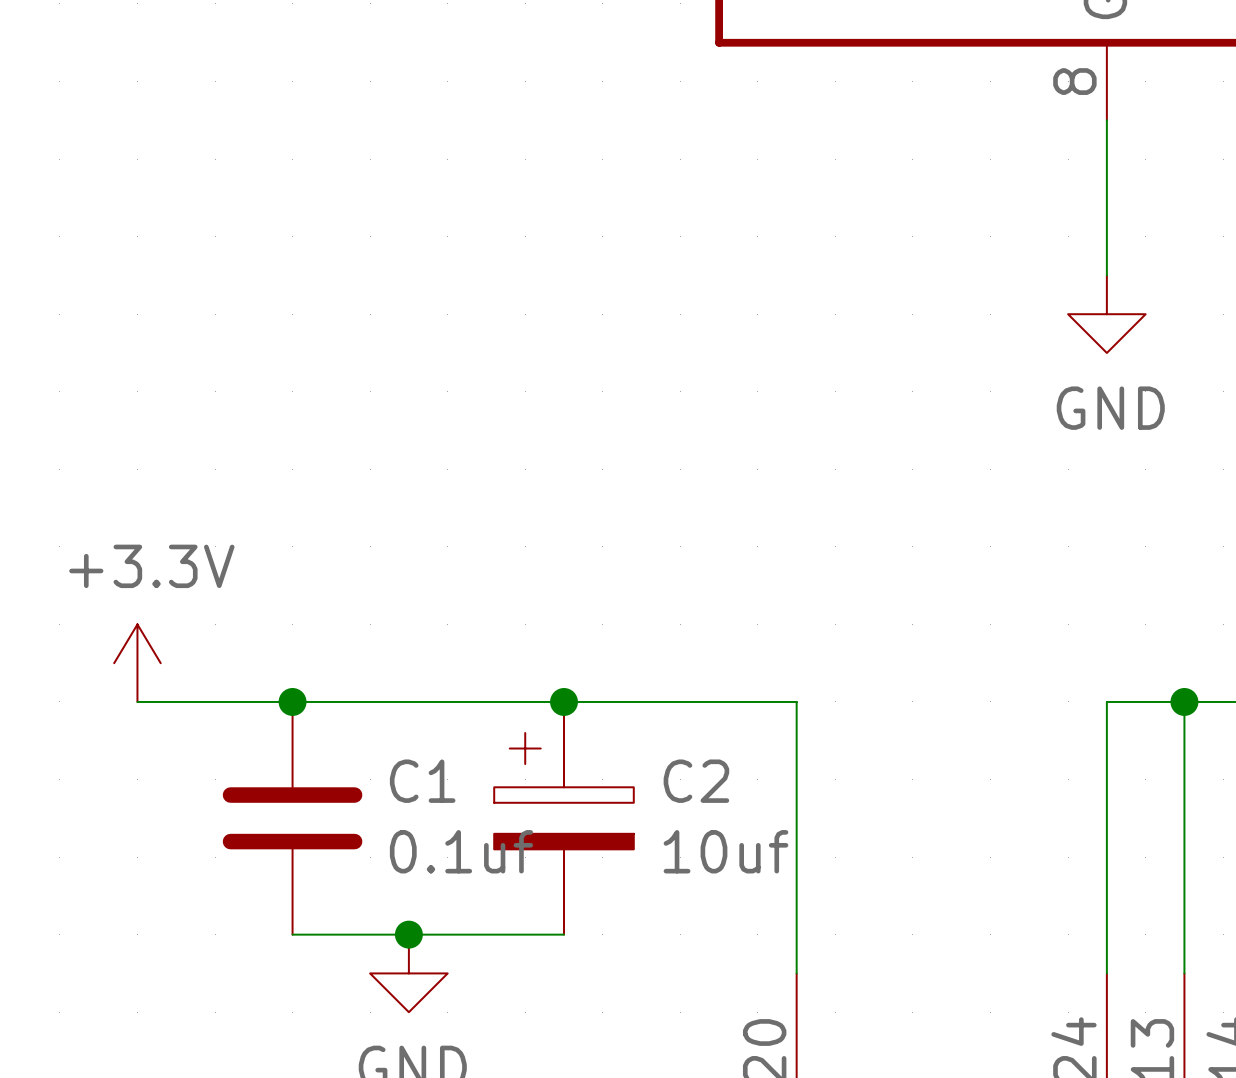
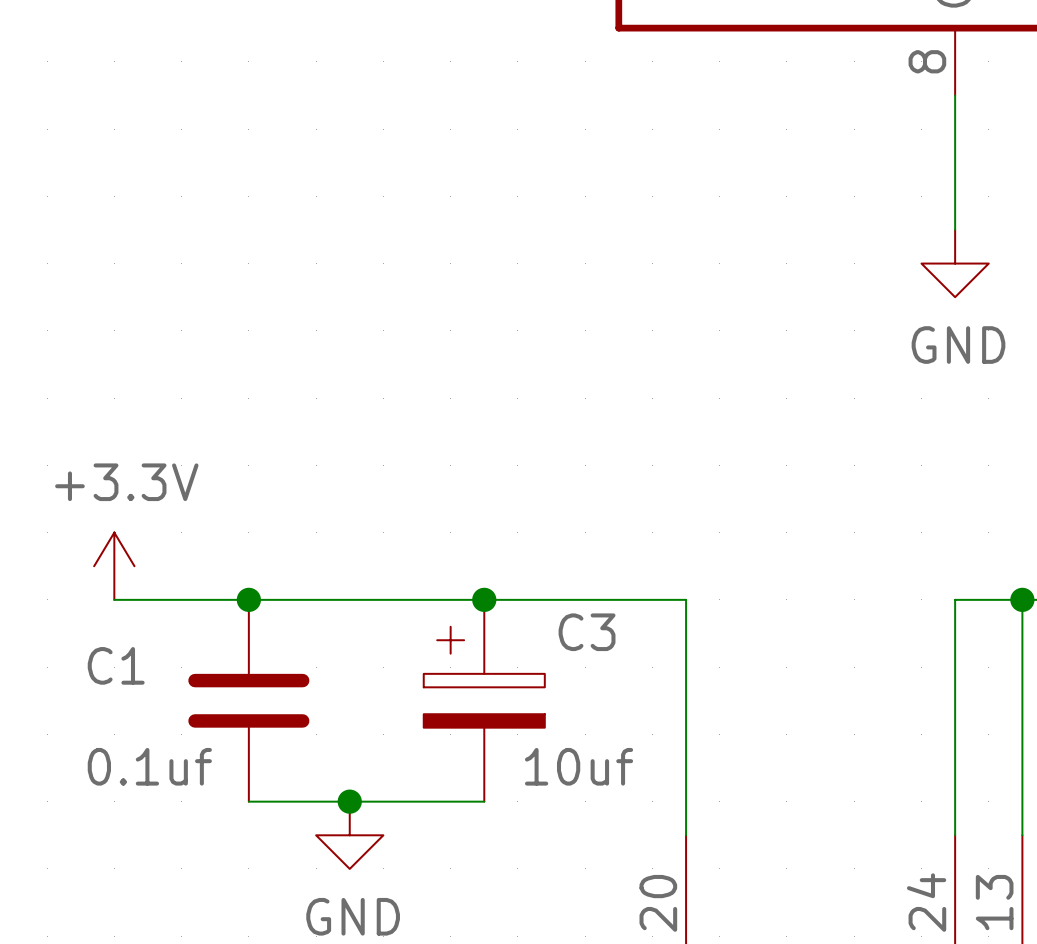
C1 name position: C1 (422, 781) -> C1 (116, 665)
C2 name: C2 (696, 781) -> C3 (587, 632)
C1 value position: 0.1uf (461, 851) -> 0.1uf (149, 766)
C2 value position: 10uf (725, 851) -> 10uf (579, 766)

